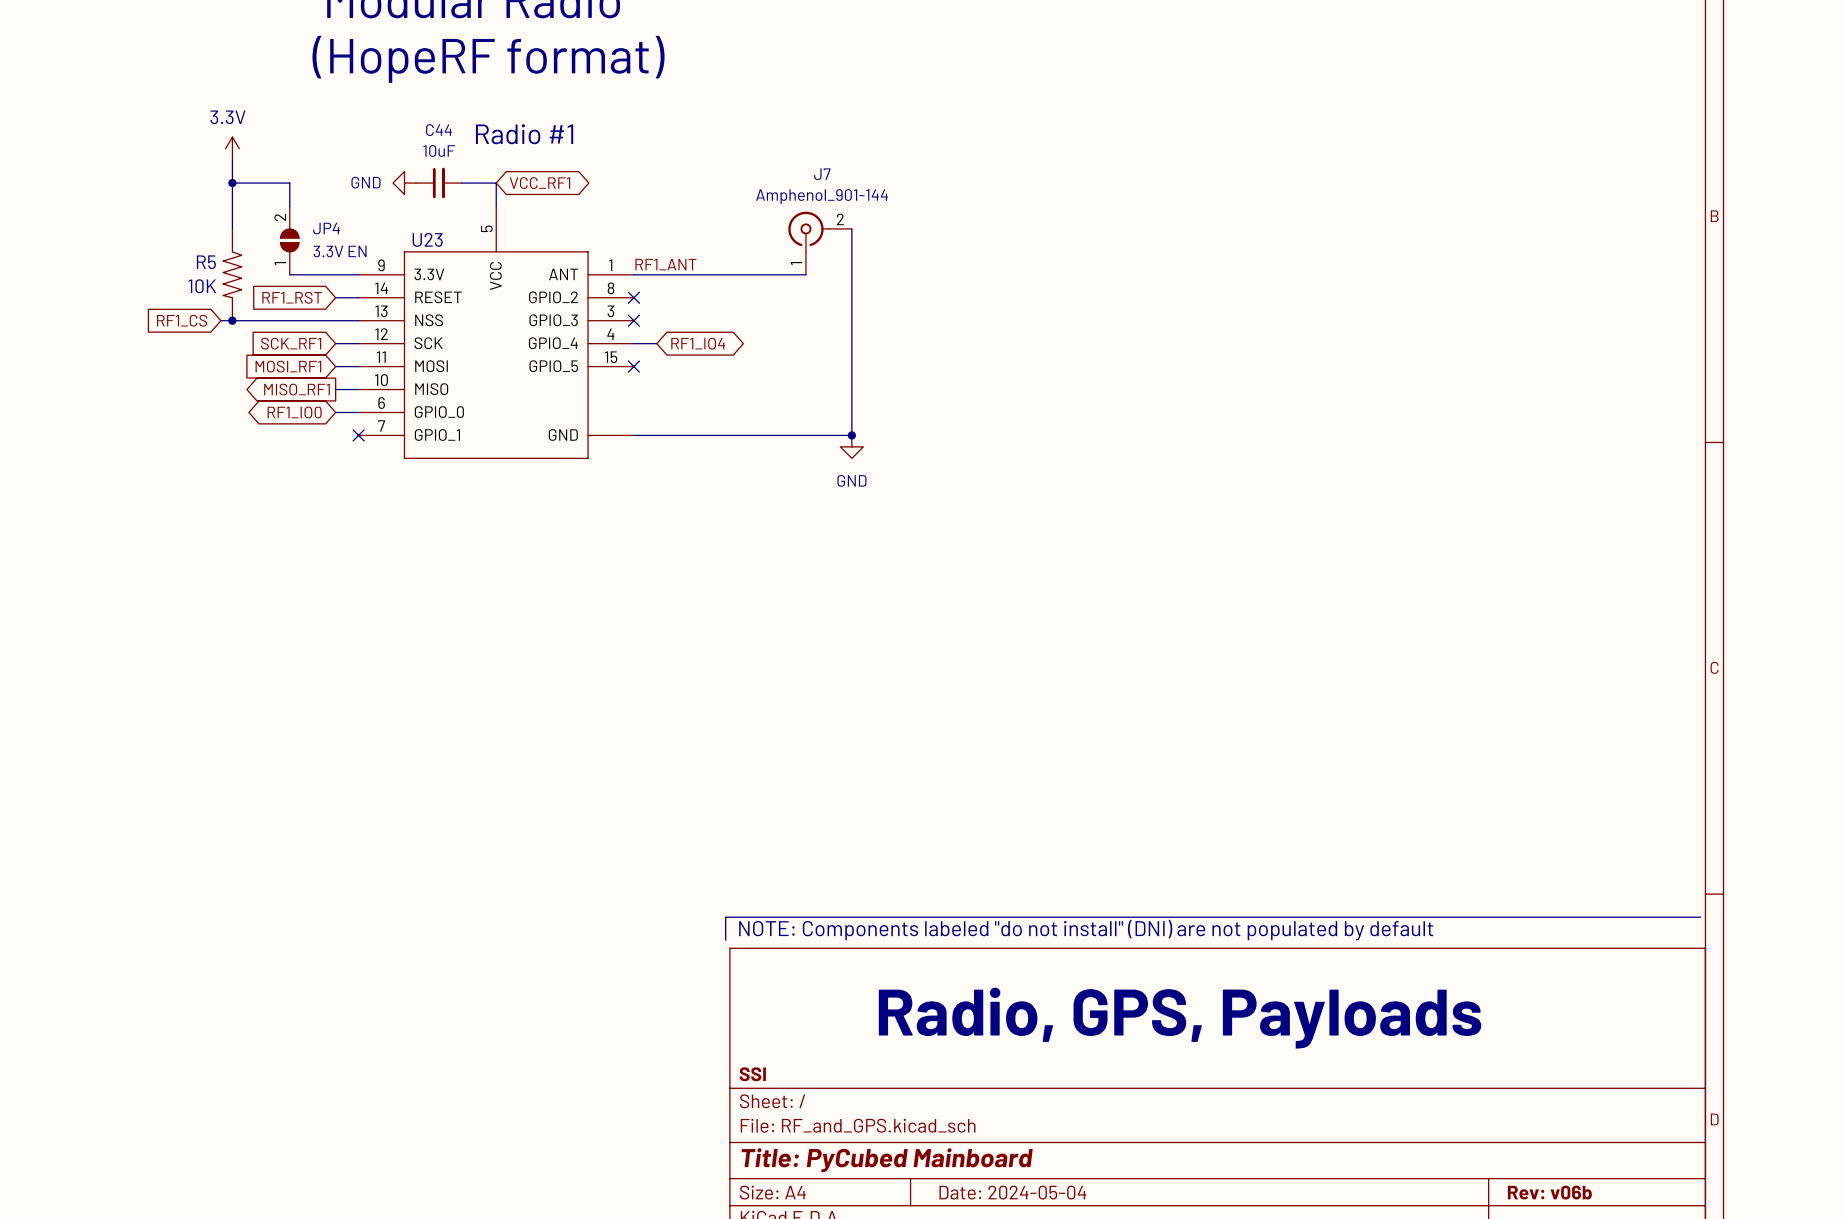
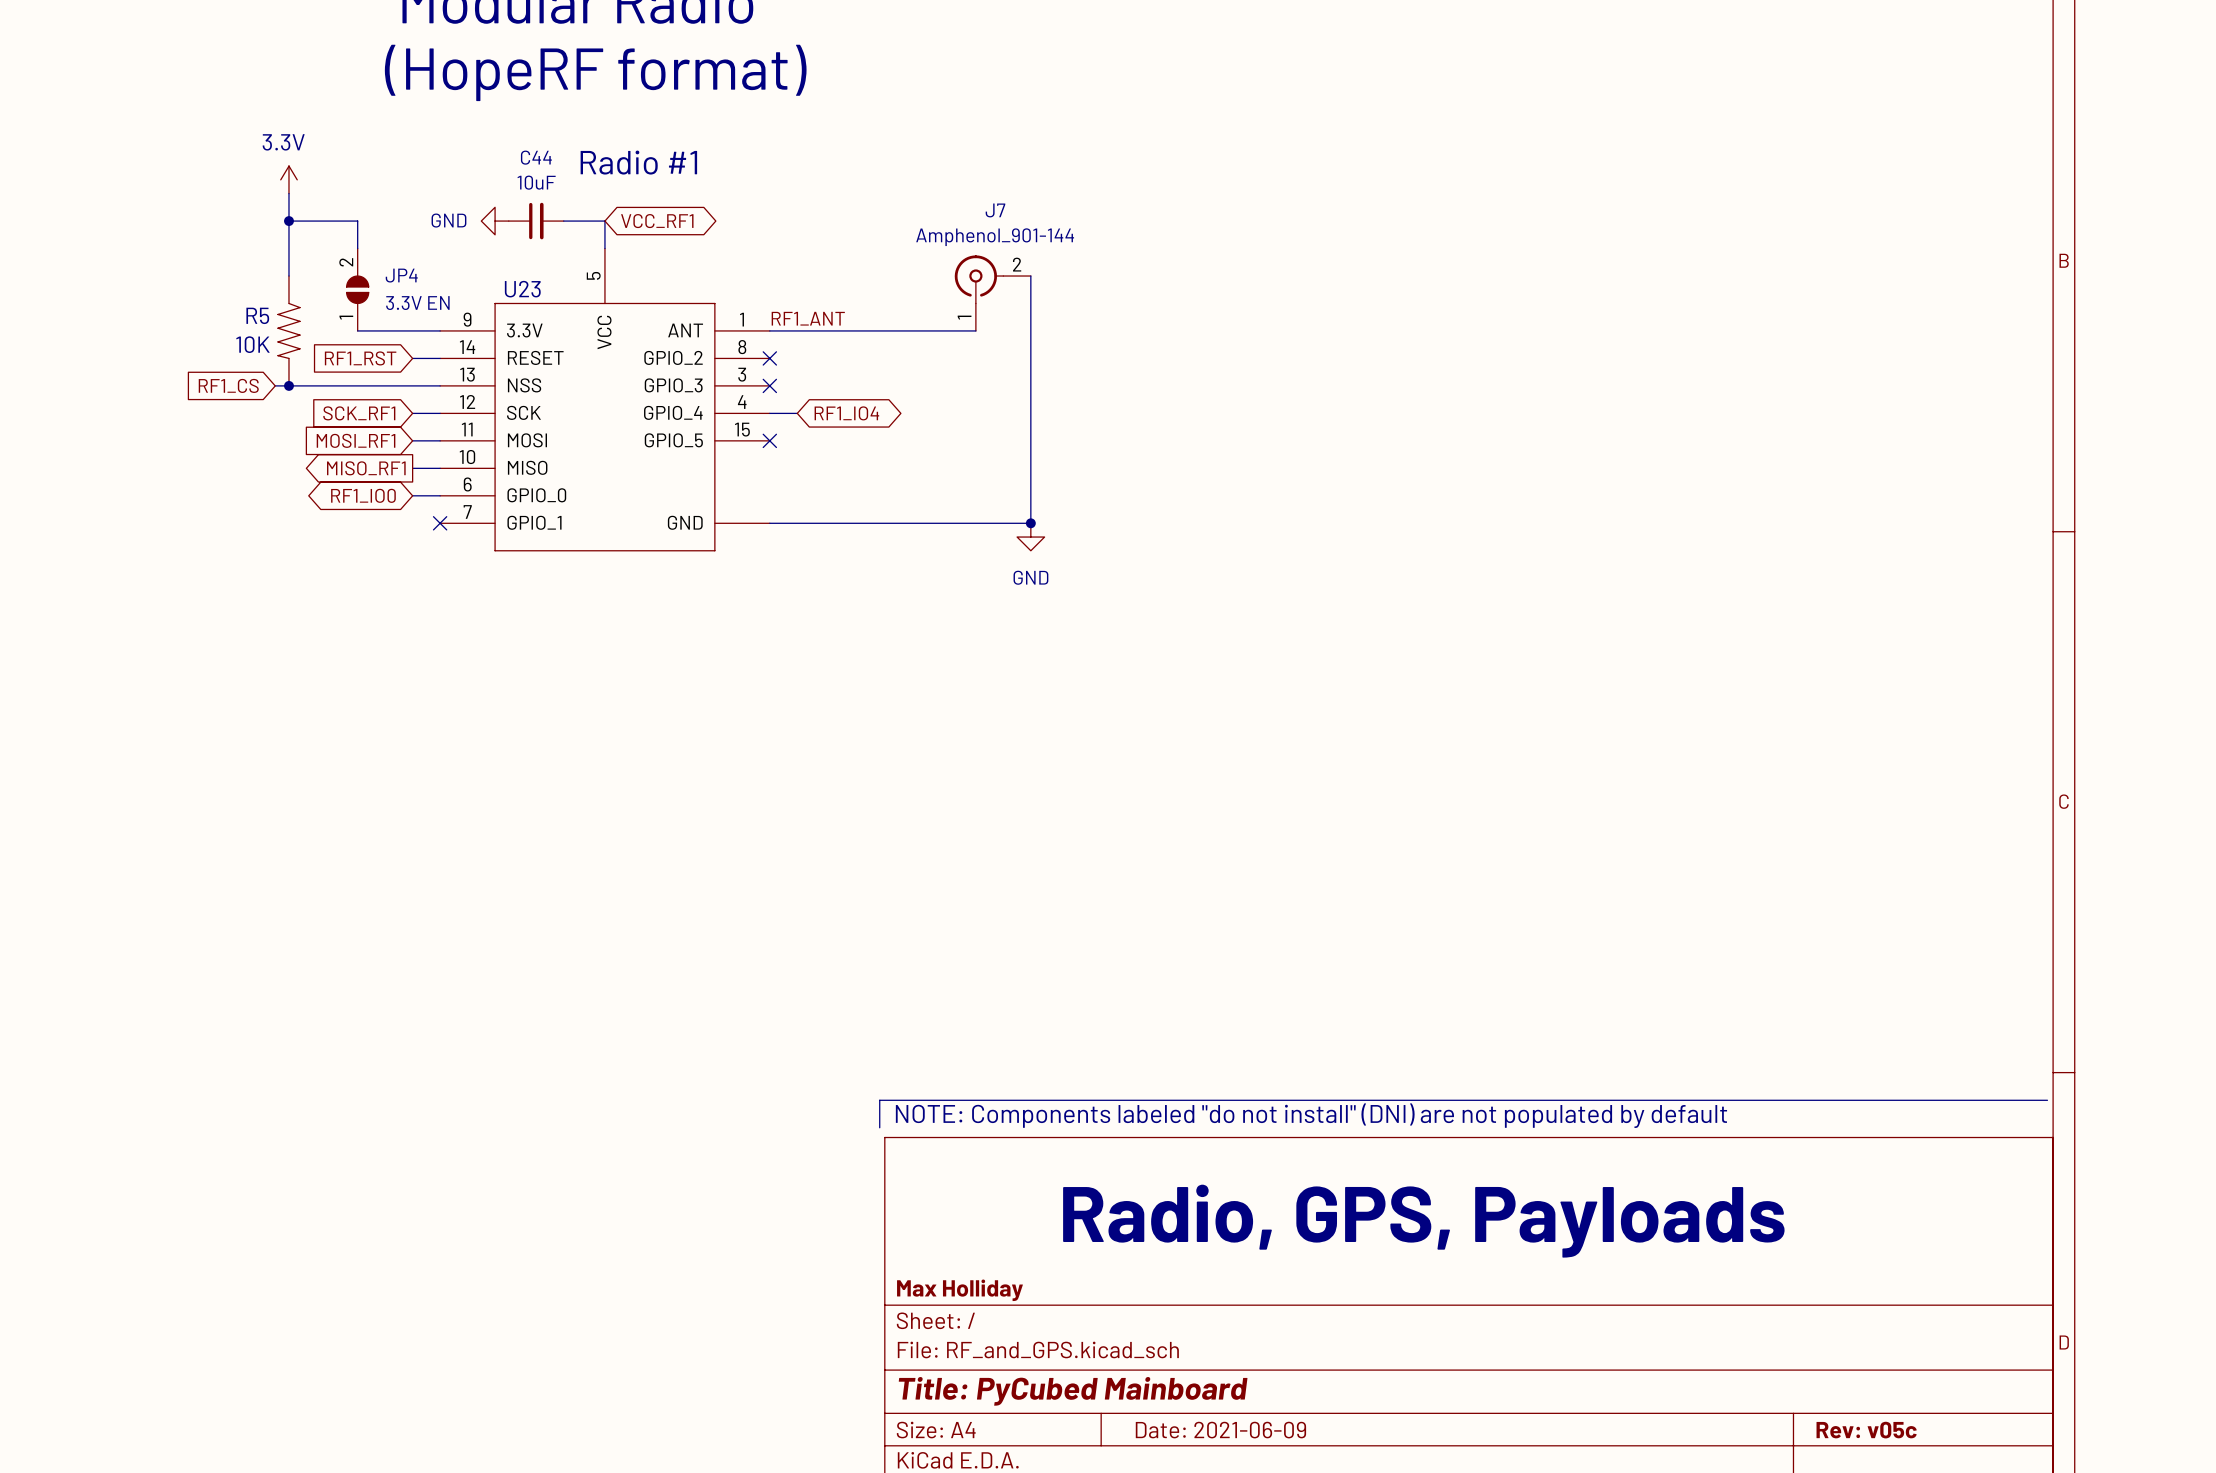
title block: SSI (752, 1074) -> Max Holliday (959, 1290)
title block: Date: 2024-05-04 (1012, 1192) -> Date: 2021-06-09 (1220, 1430)
title block: Rev: v06b (1549, 1192) -> Rev: v05c (1866, 1430)

